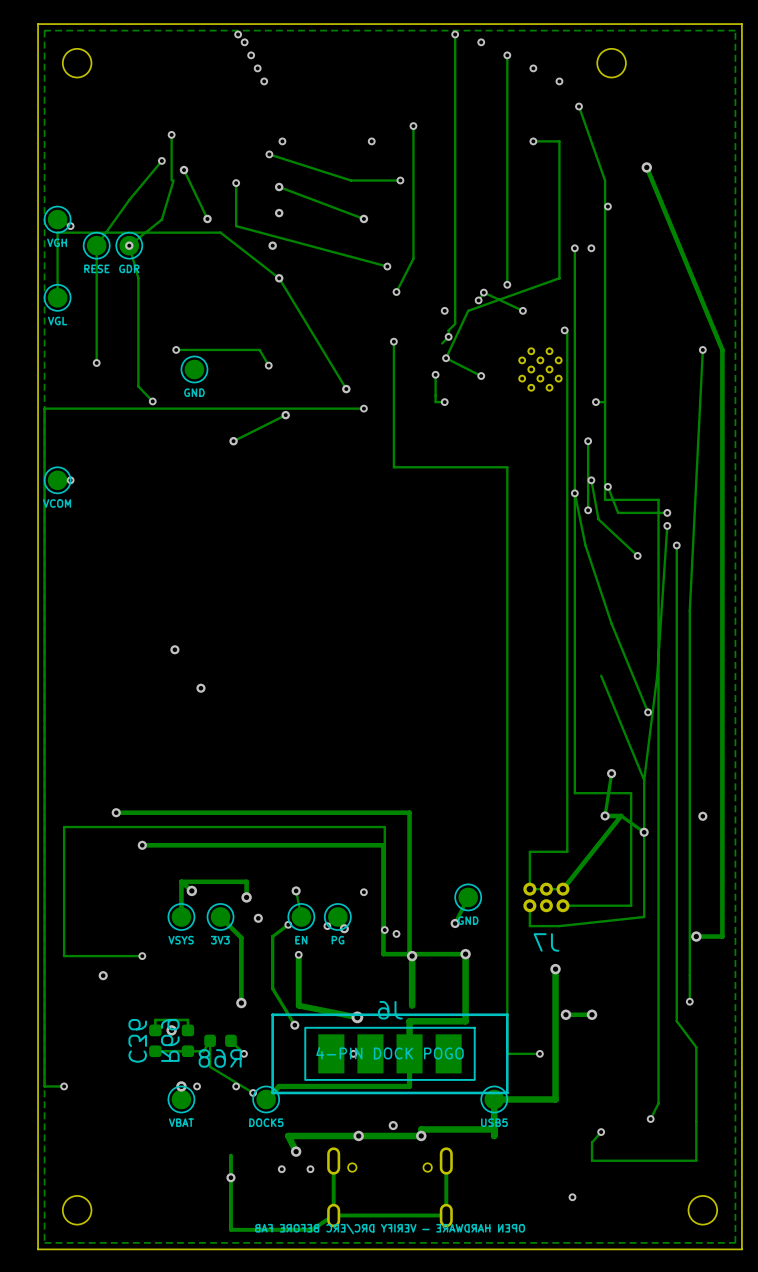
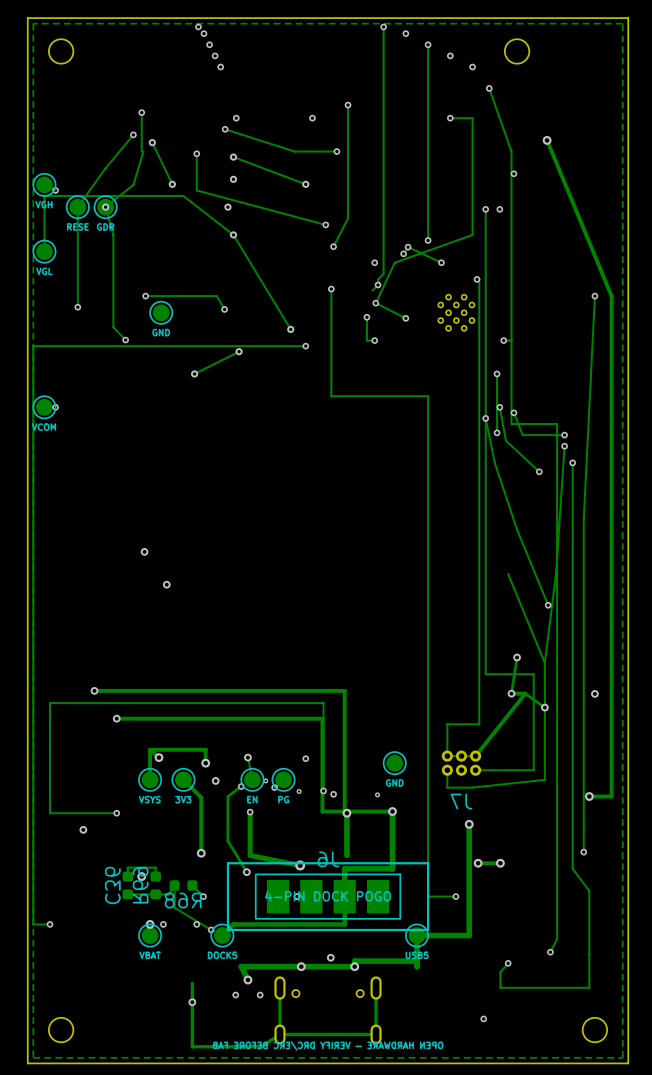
track: (468, 897) (455, 923) -> none
via: none -> (265, 780)
via: (455, 923) -> none
via: (344, 928) -> none
via: none -> (299, 791)
via: none -> (377, 794)

